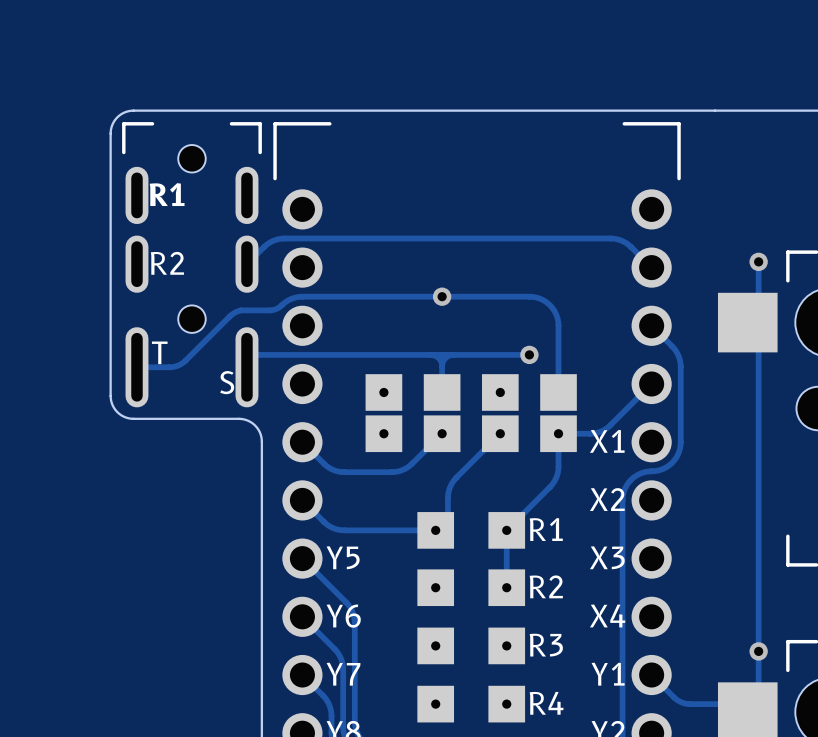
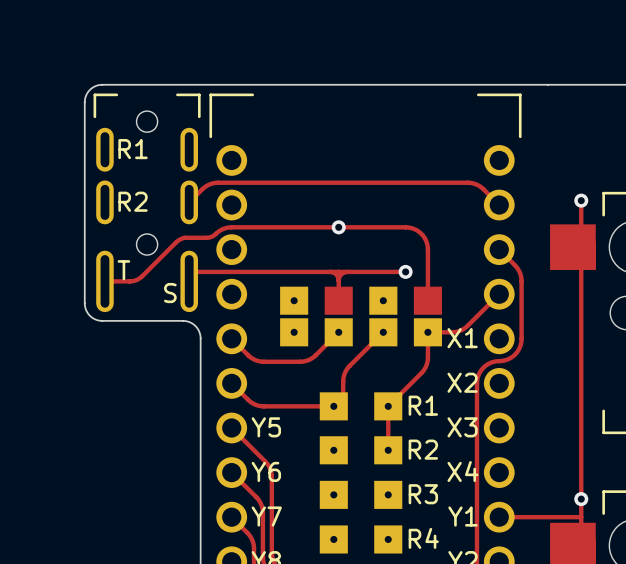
track: (651, 675) (681, 702) (740, 704) (758, 722) -> (499, 517) (581, 517)

